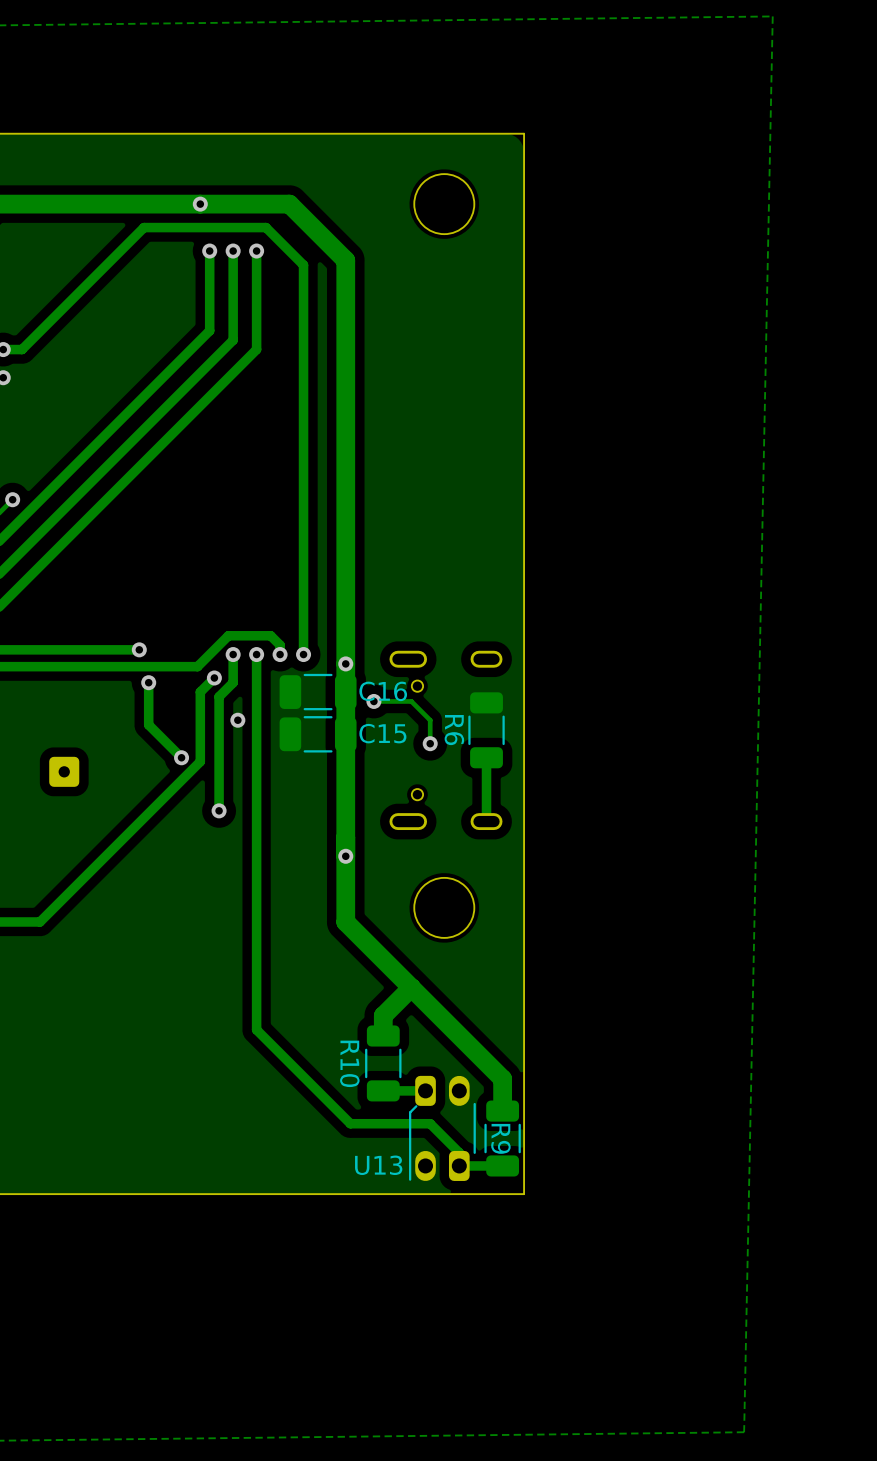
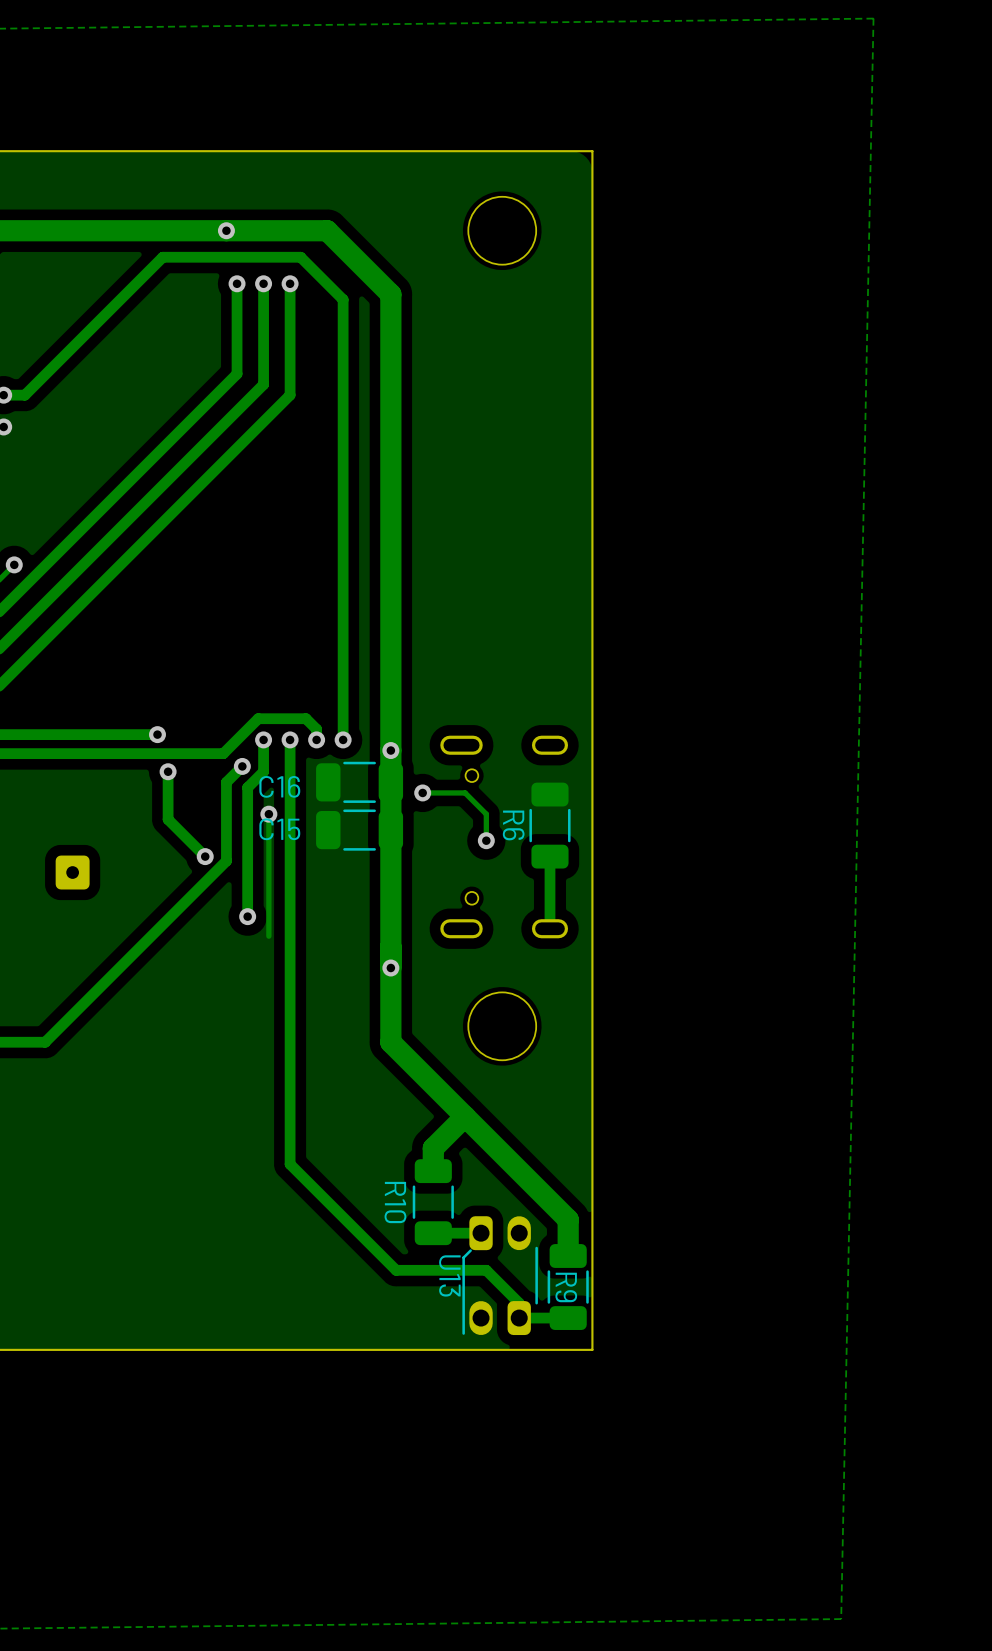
C16 name position: C16 (383, 691) -> C16 (279, 786)
track: none -> (268, 814) (268, 936)
C15 name position: C15 (382, 733) -> C15 (279, 829)
U13 name rotation: 0° (378, 1165) -> 90° clockwise (449, 1275)

